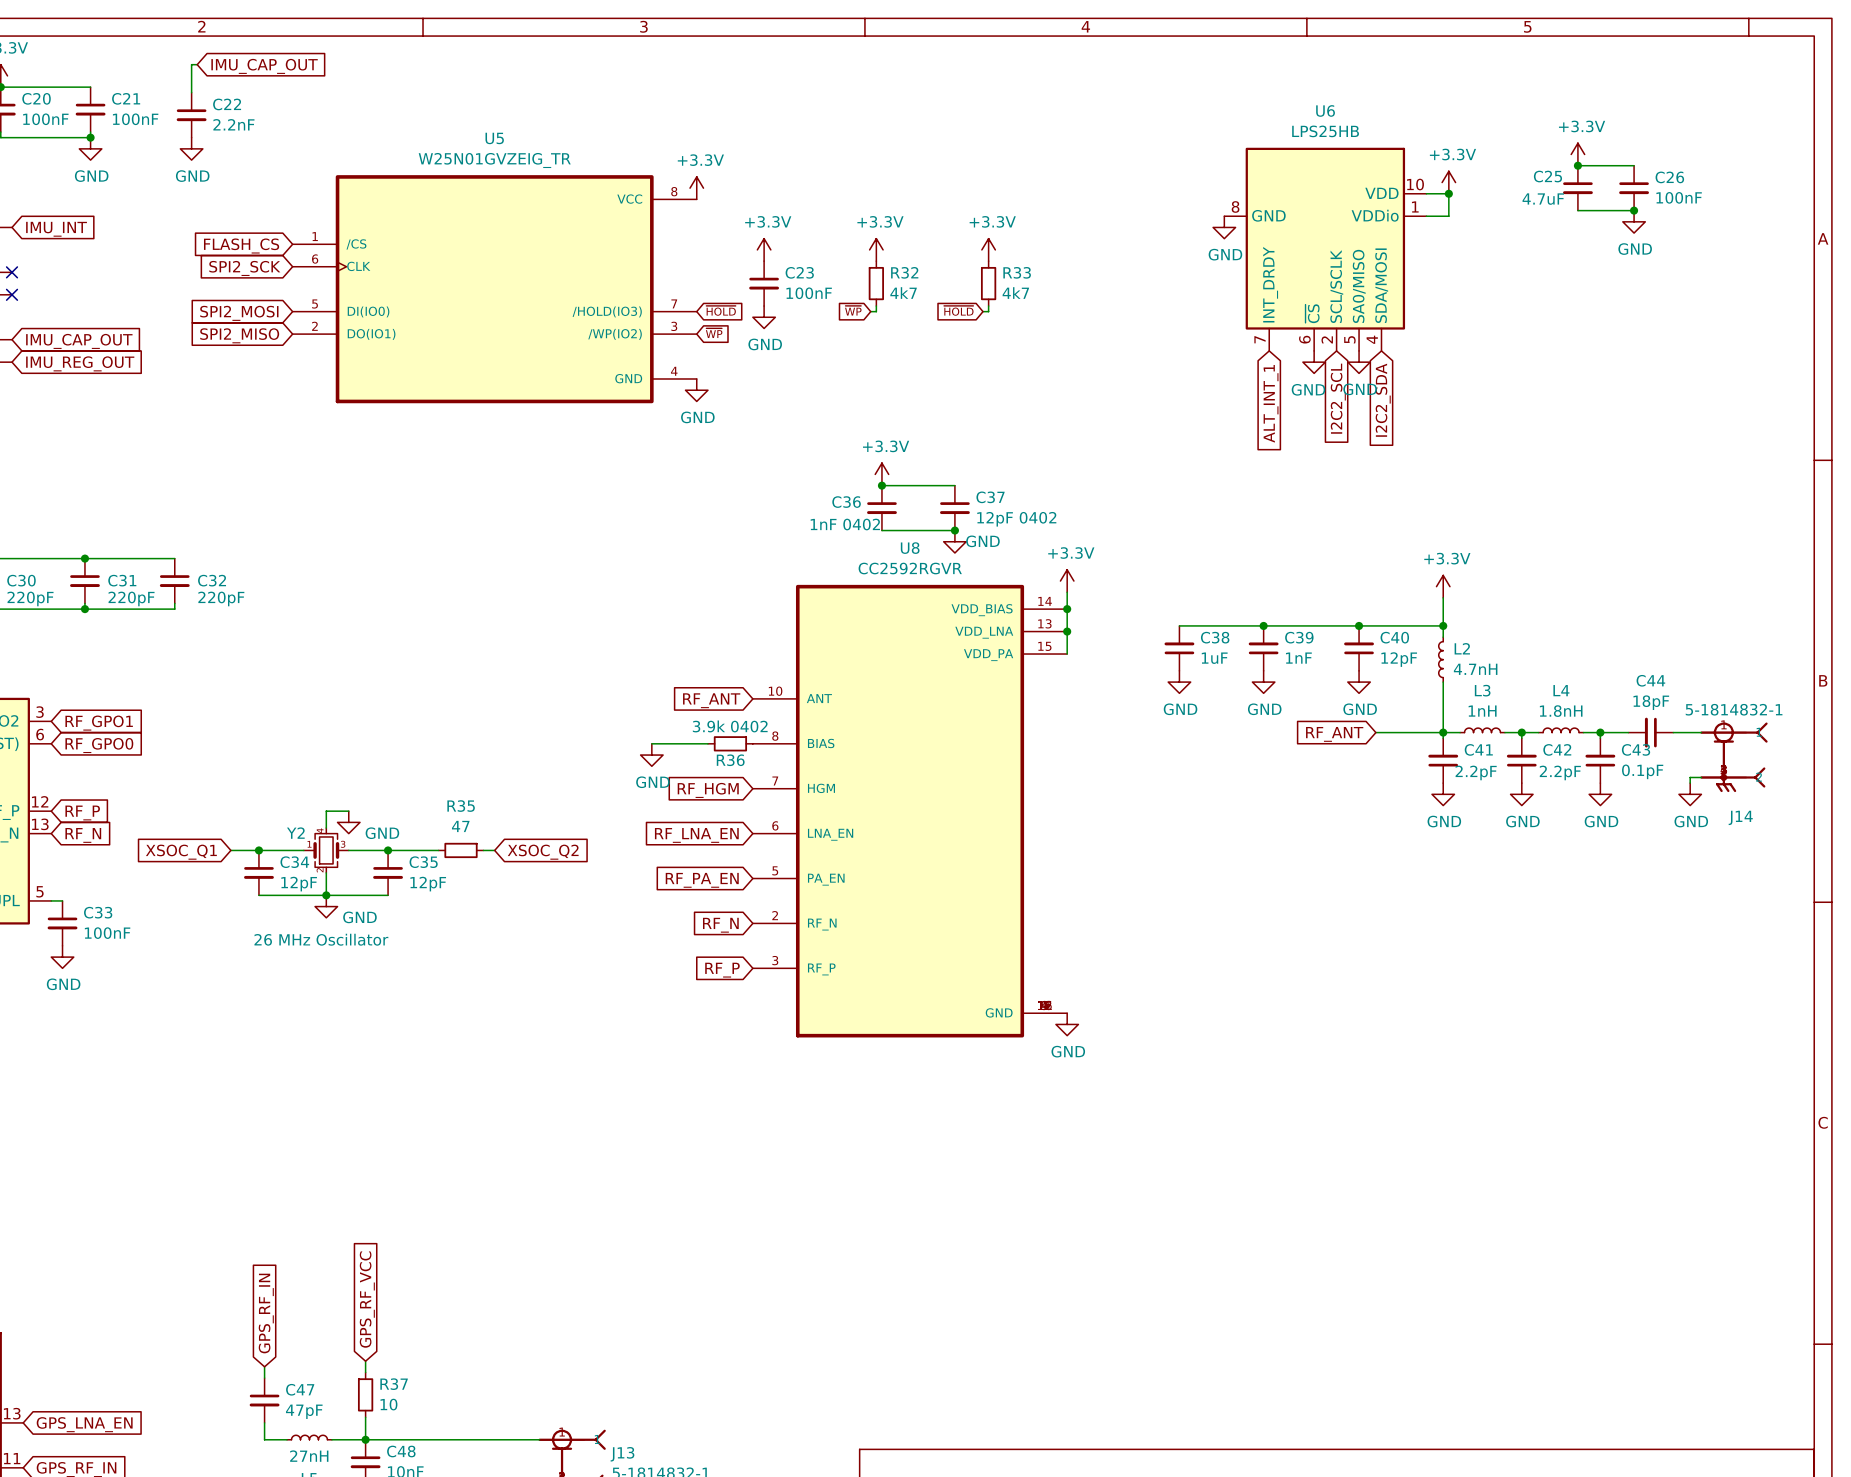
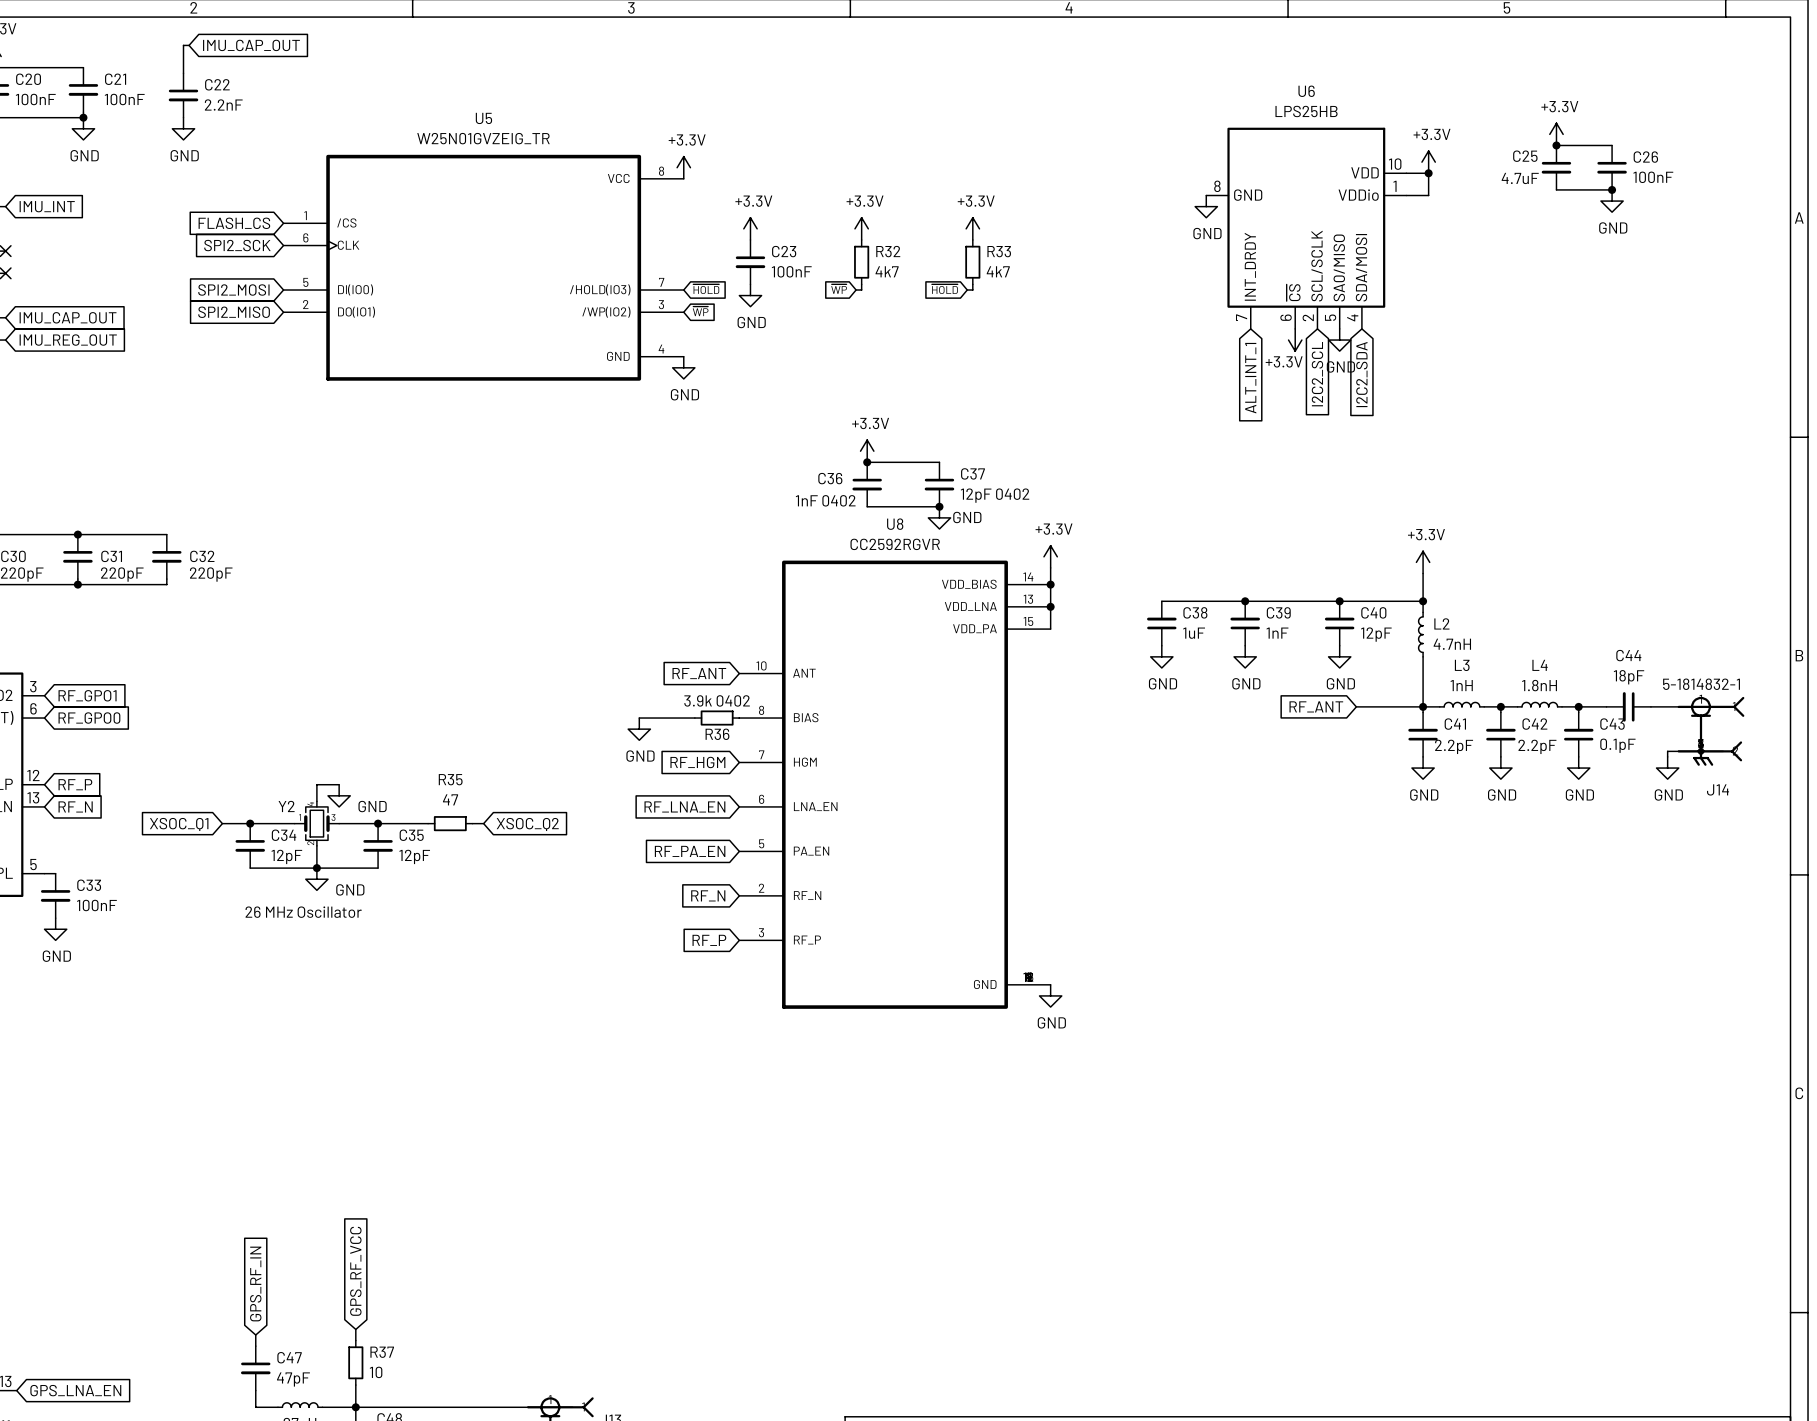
power symbol: GND (1314, 362) -> +3.3V (1295, 340)

